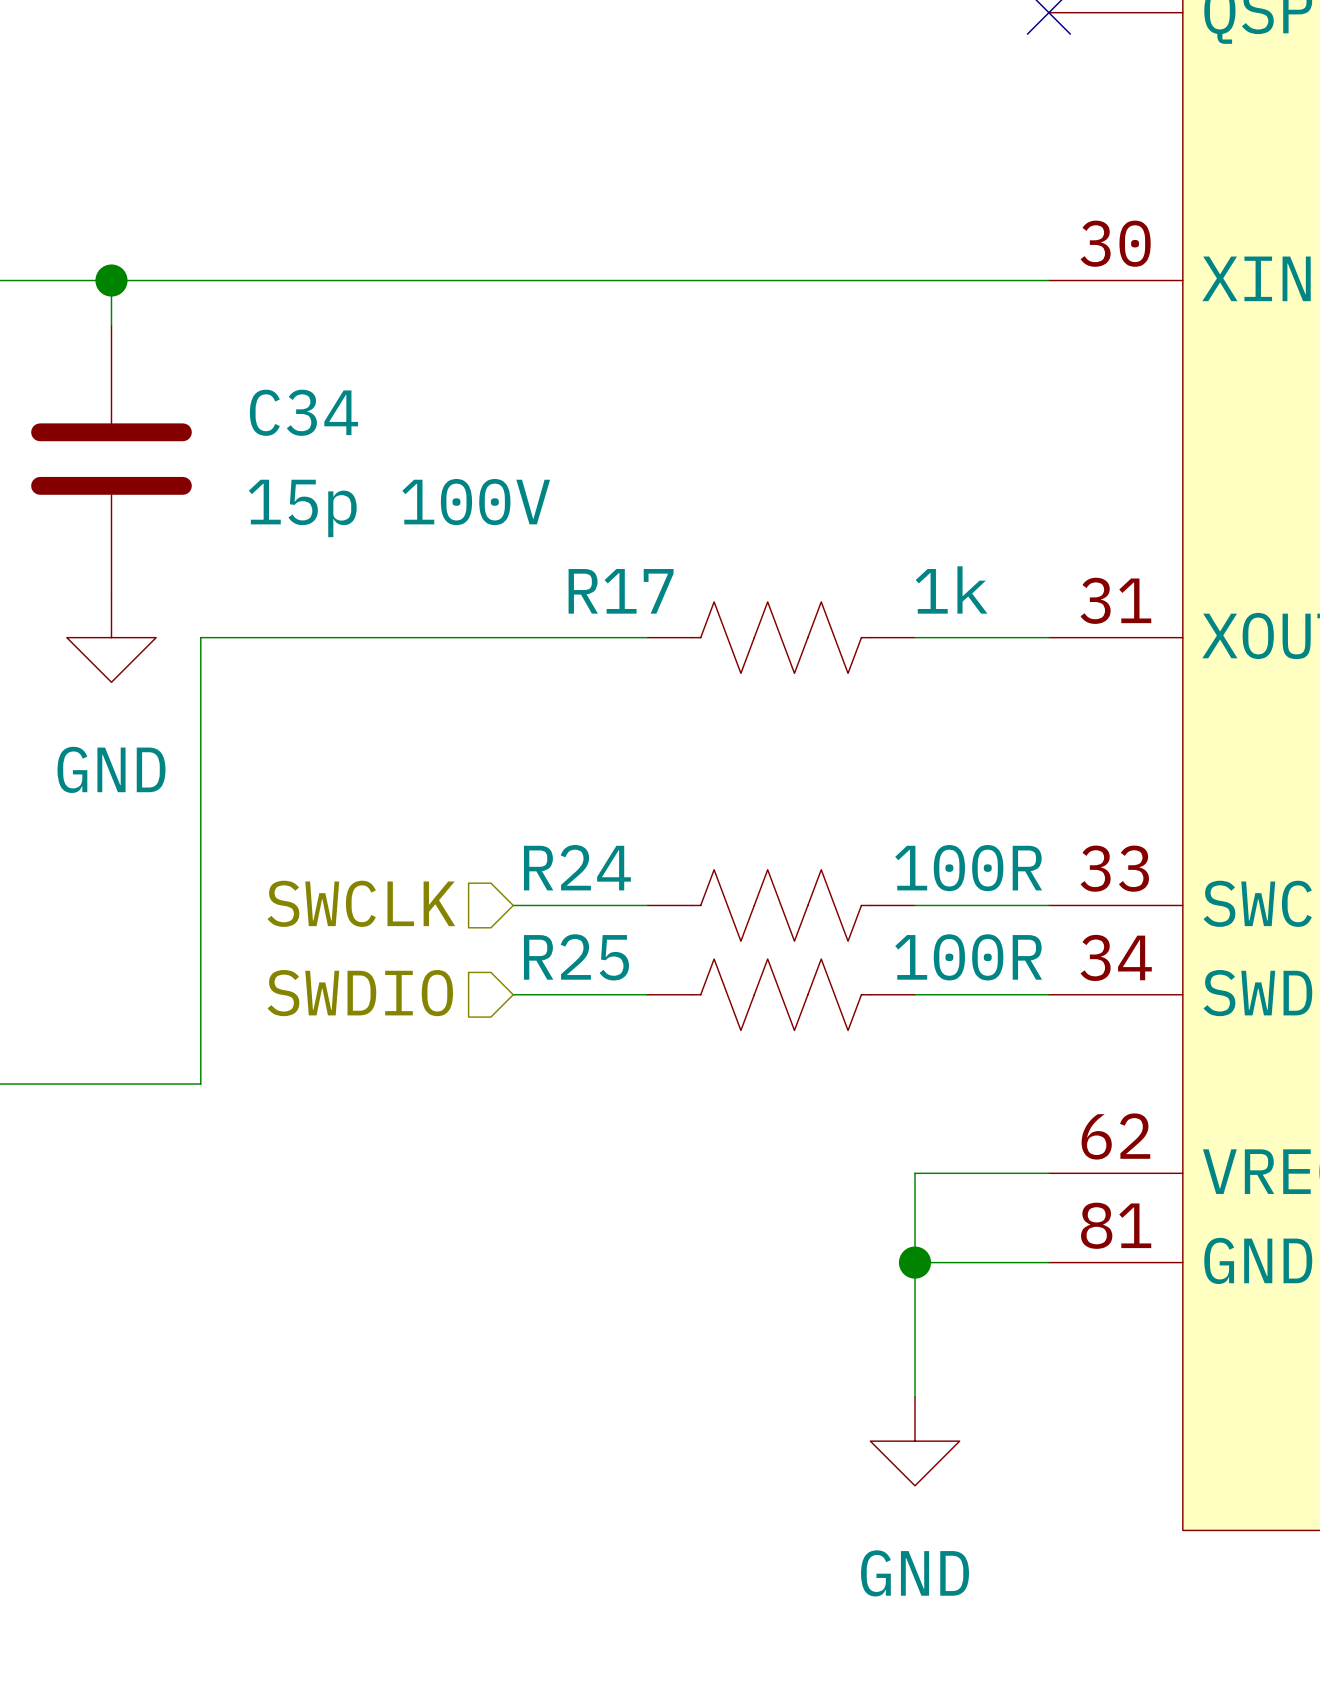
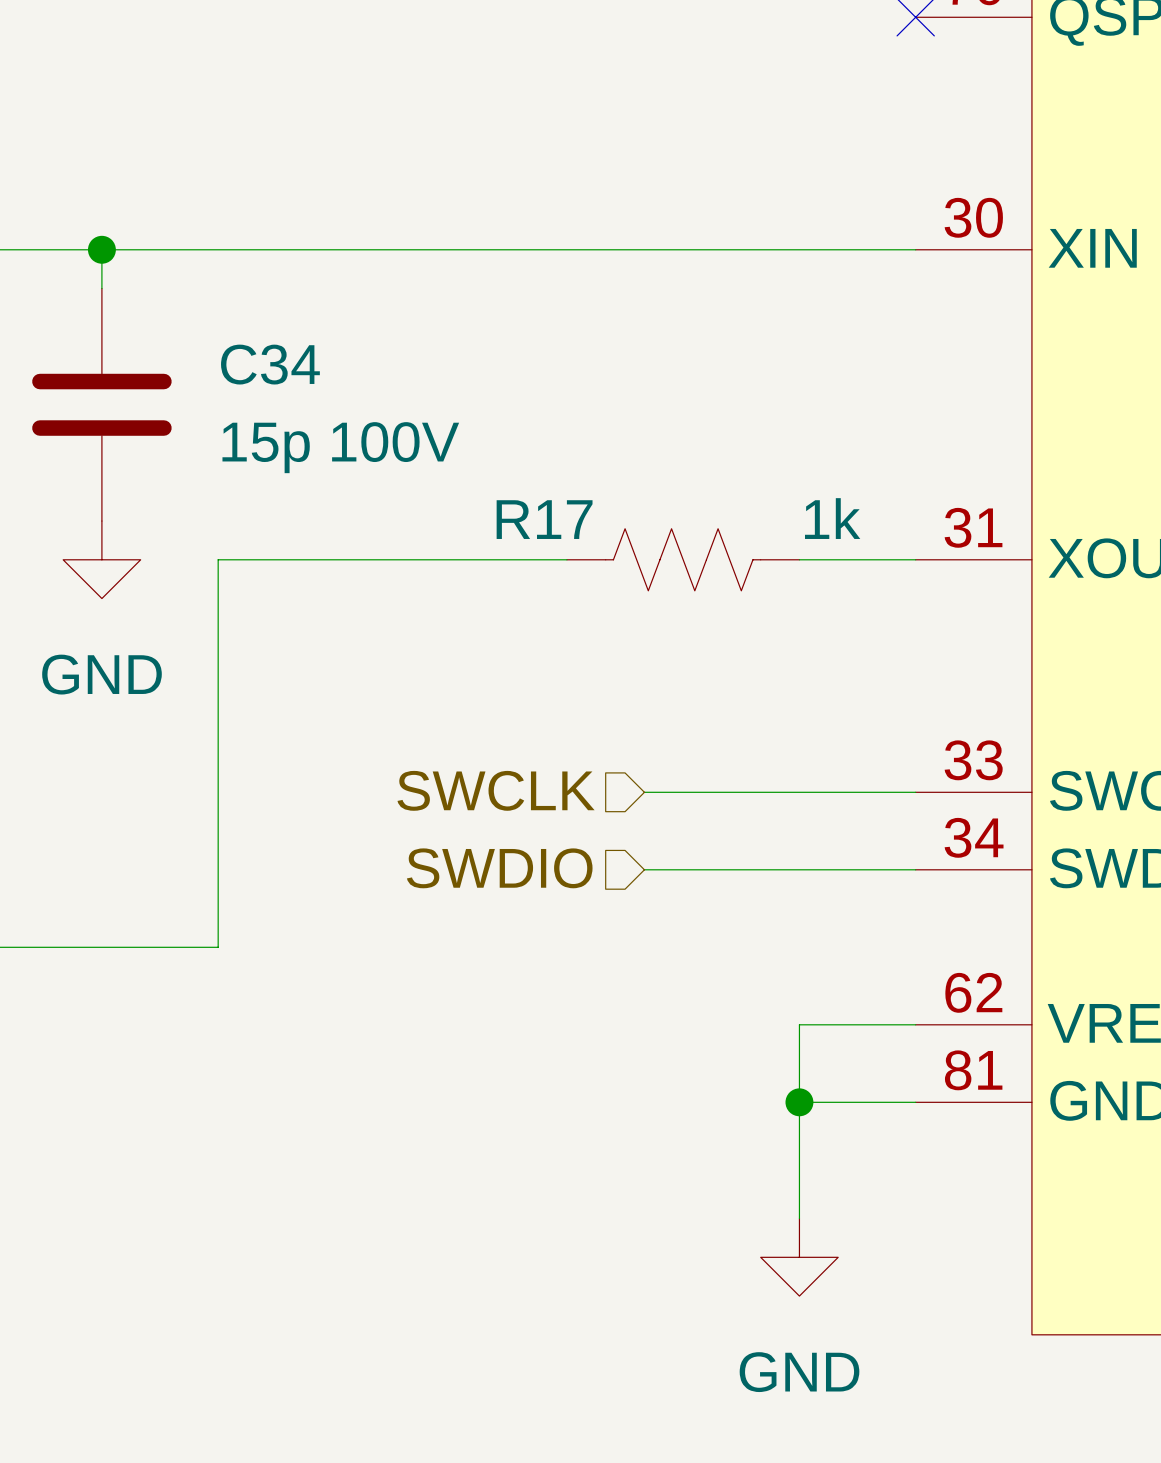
wire: (245, 637) (200, 637) (200, 1084) -> (218, 559) (218, 947) (179, 947)
hierarchical label position: SWCLK (361, 903) -> SWCLK (496, 790)
wire: (513, 905) (647, 905) -> none
wire: none -> (644, 792) (799, 792)
R24: 100R (781, 905) -> none
hierarchical label position: SWDIO (360, 993) -> SWDIO (499, 868)
wire: (513, 994) (647, 994) -> none
wire: none -> (644, 869) (799, 869)
R25: 100R (781, 994) -> none

